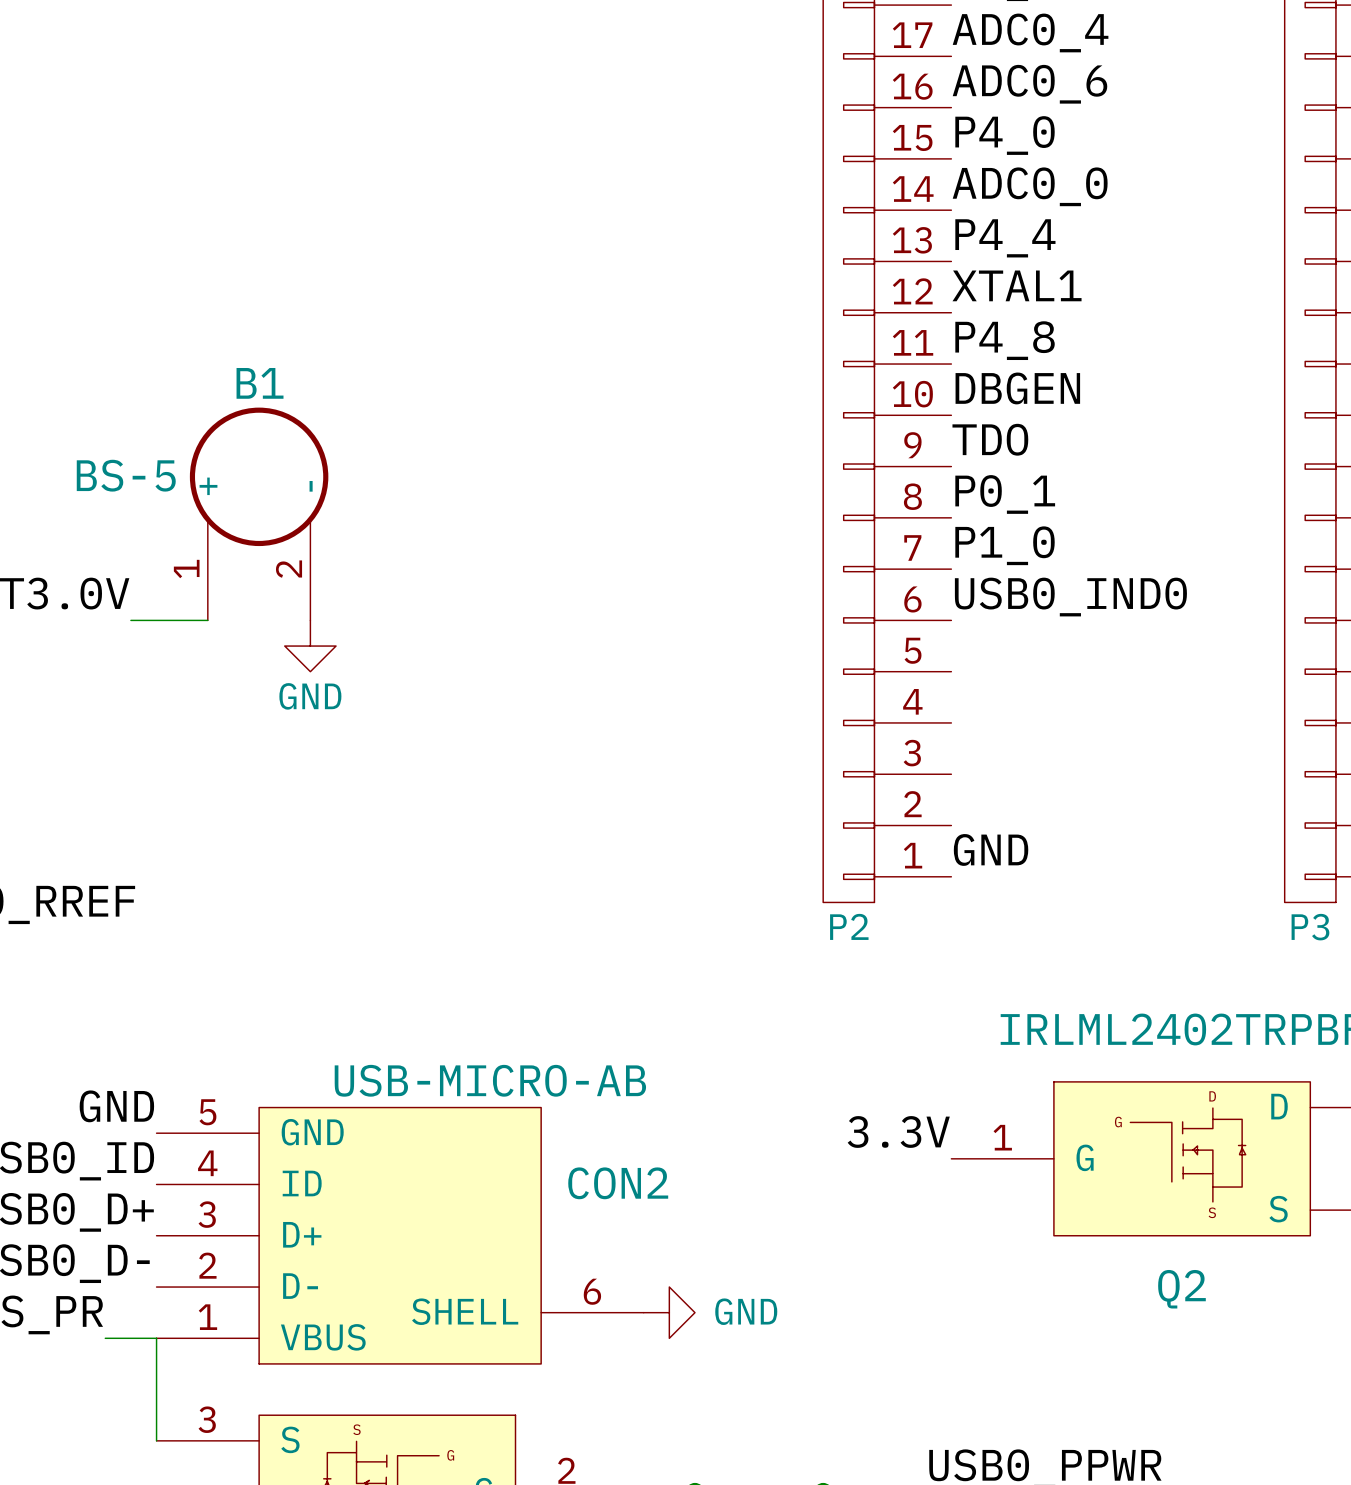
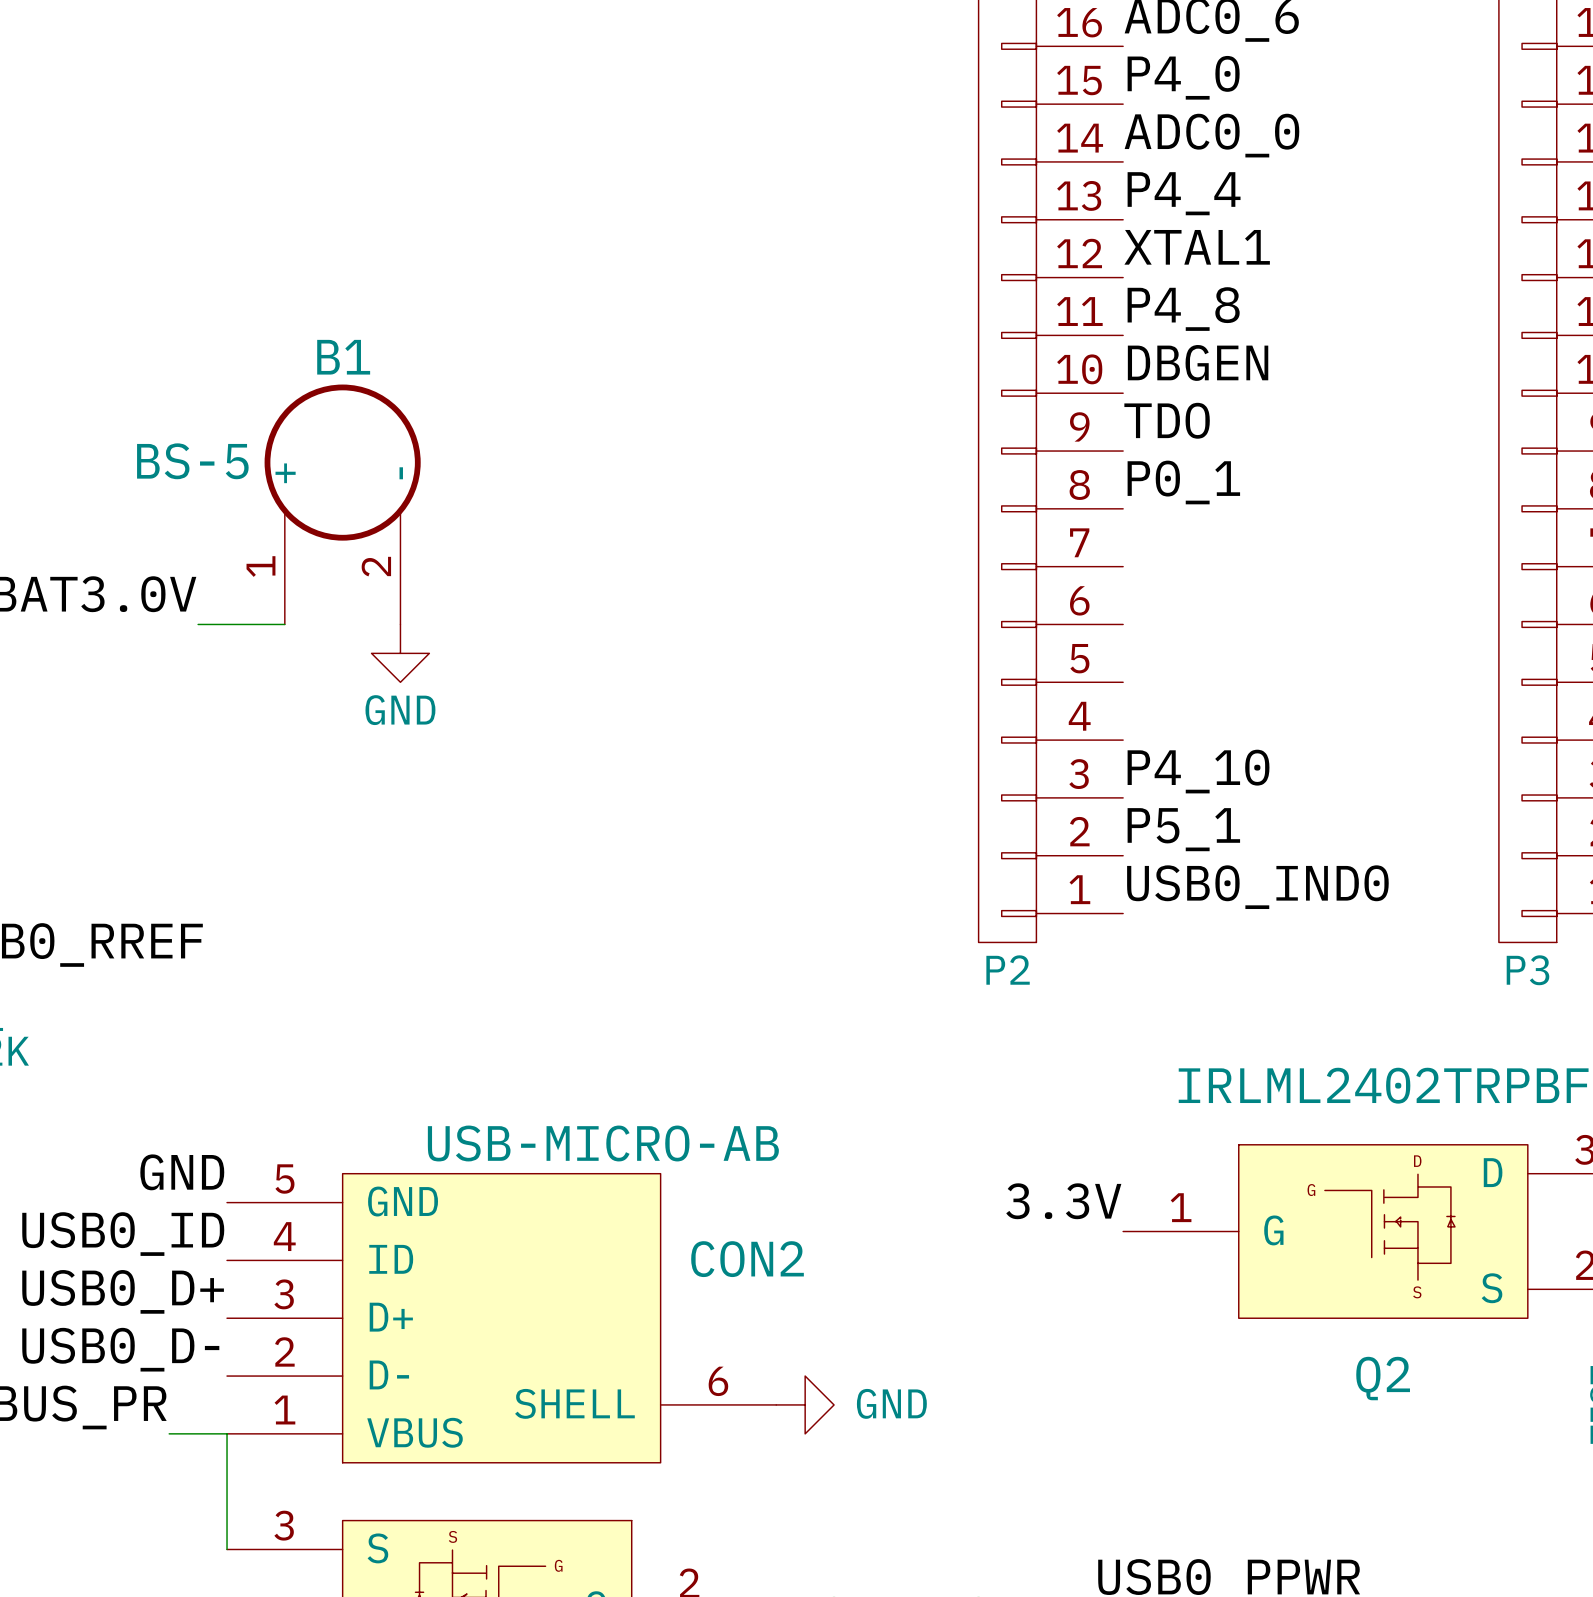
label: P1_0 (1005, 545) -> none
label: USB0_IND0 (1070, 597) -> none
label: none -> P4_10 (1198, 771)
label: none -> P5_1 (1183, 829)
label: GND (991, 849) -> USB0_IND0 (1257, 887)

